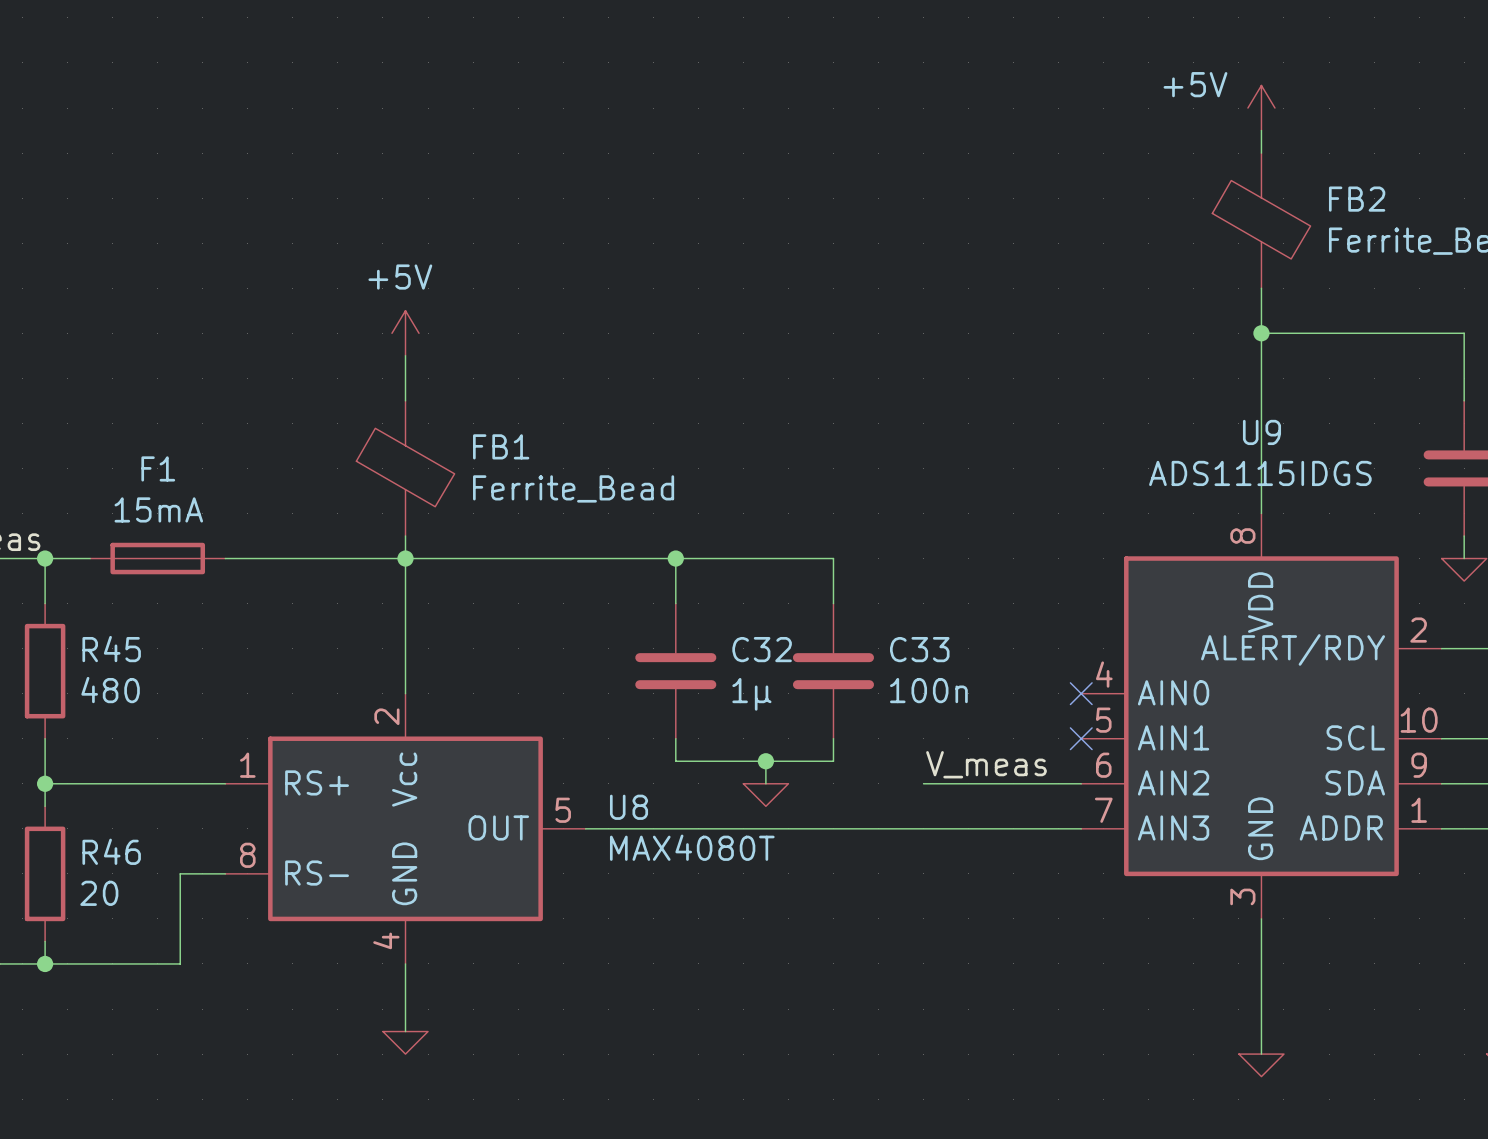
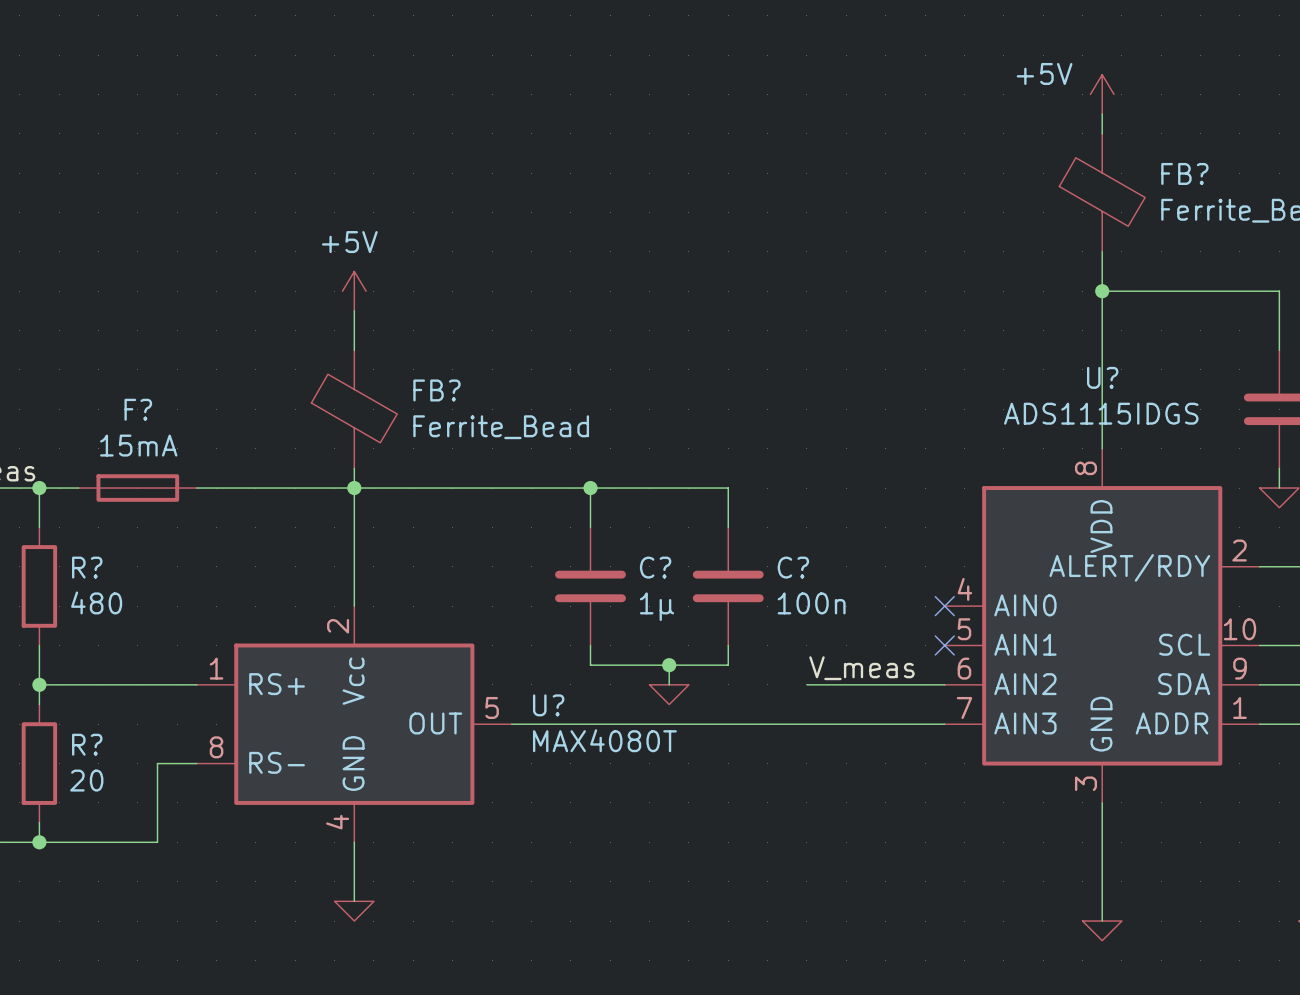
FB2 name: FB2 (1357, 199) -> FB? (1184, 173)
U9 name: U9 (1261, 432) -> U? (1102, 377)
FB1 name: FB1 (501, 446) -> FB? (436, 390)
F1 name: F1 (158, 468) -> F? (138, 409)
R45 name: R45 (111, 649) -> R? (87, 567)
C32 name: C32 (762, 649) -> C? (655, 567)
C33 name: C33 (919, 649) -> C? (793, 567)
U8 name: U8 (629, 807) -> U? (548, 705)
R46 name: R46 (111, 851) -> R? (87, 744)

